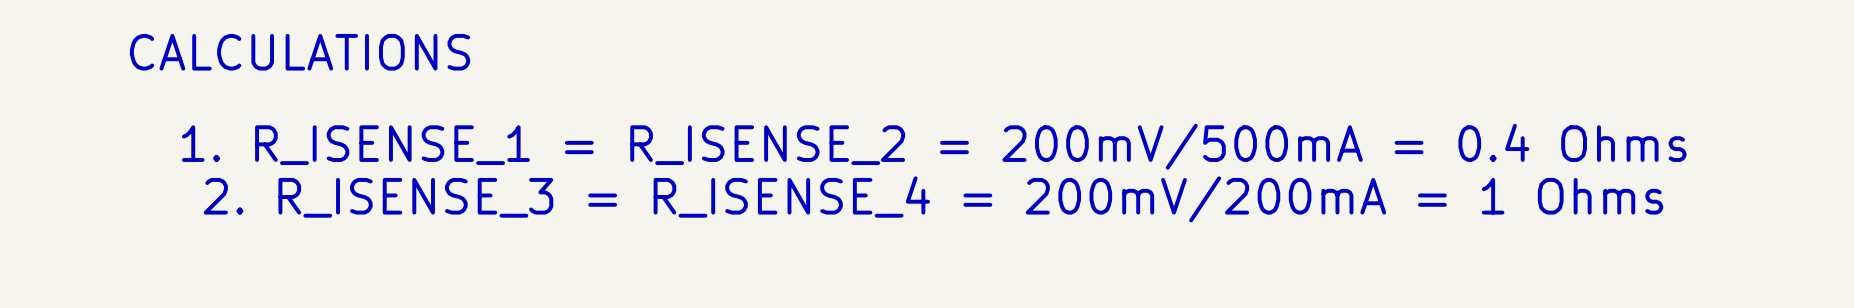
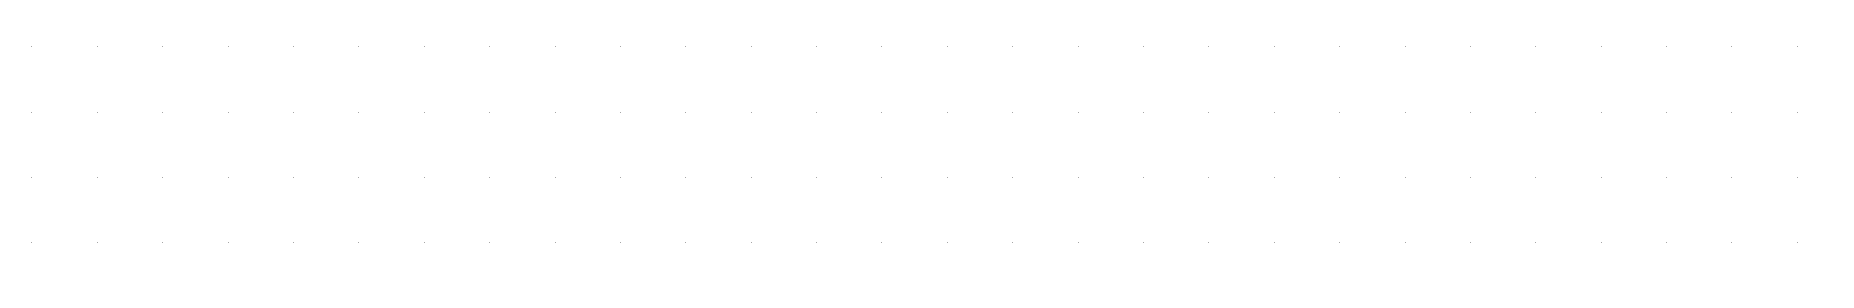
text: CALCULATIONS (300, 52) -> none
text: 1. R_ISENSE_1 = R_ISENSE_2 = 200mV/500mA = 0.4 Ohms (934, 146) -> none
text: 2. R_ISENSE_3 = R_ISENSE_4 = 200mV/200mA = 1 Ohms (933, 199) -> none

